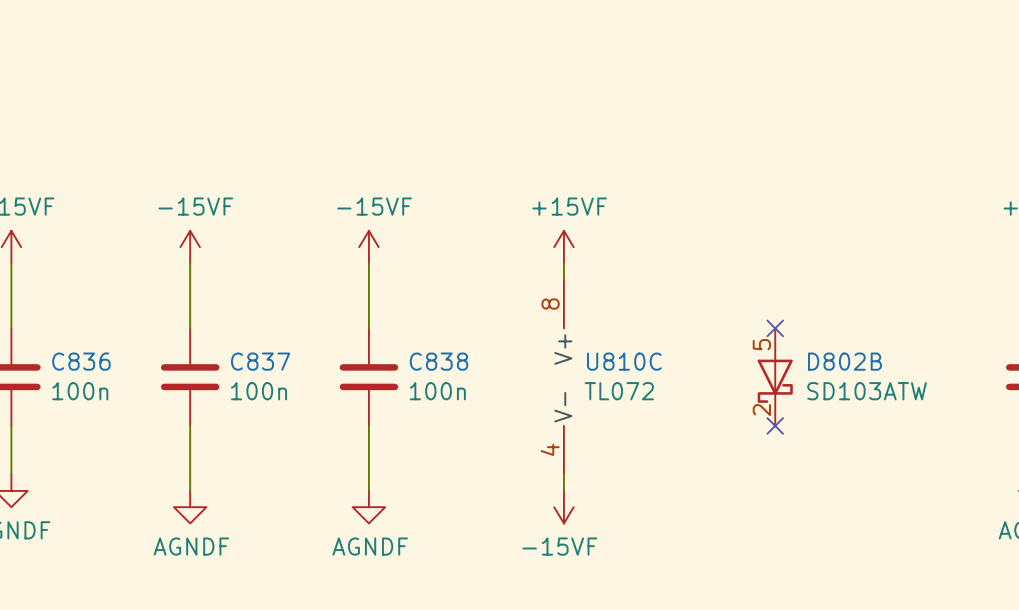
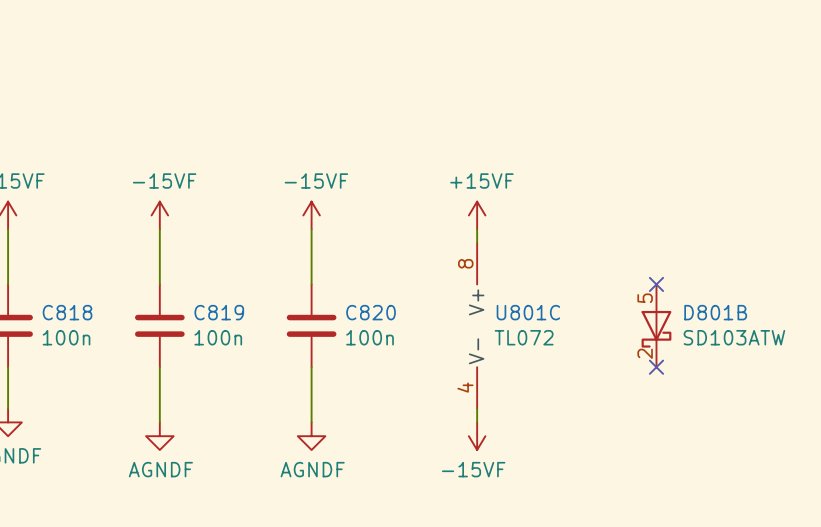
C836 name: C836 (81, 361) -> C818 (67, 312)
C837 name: C837 (260, 361) -> C819 (219, 312)
C838 name: C838 (438, 361) -> C820 (371, 312)
U810C name: U810C (624, 361) -> U801C (528, 312)
D802B name: D802B (844, 361) -> D801B (715, 312)

